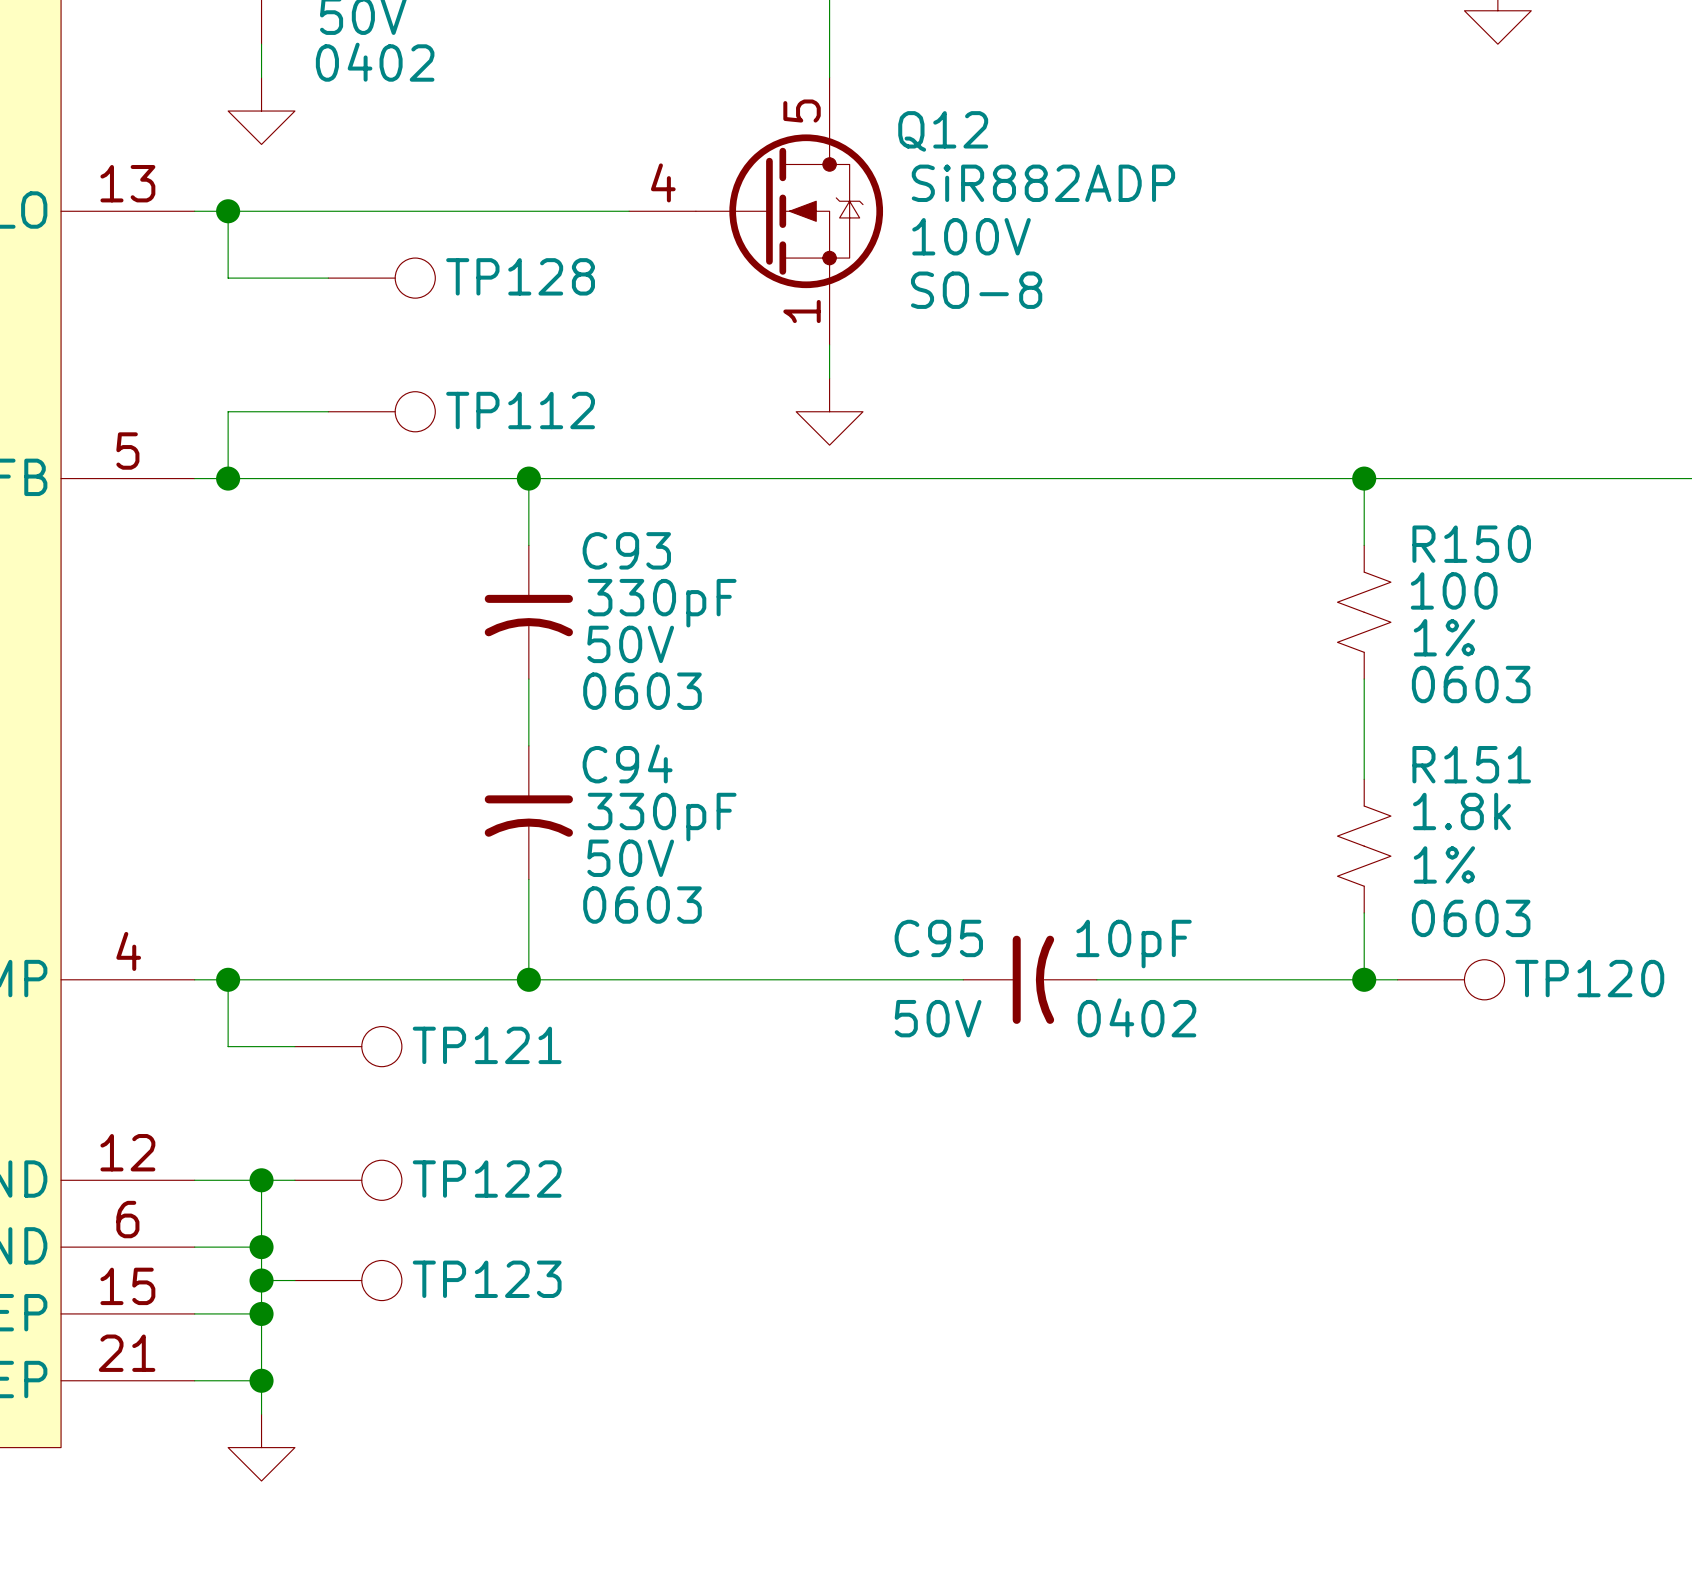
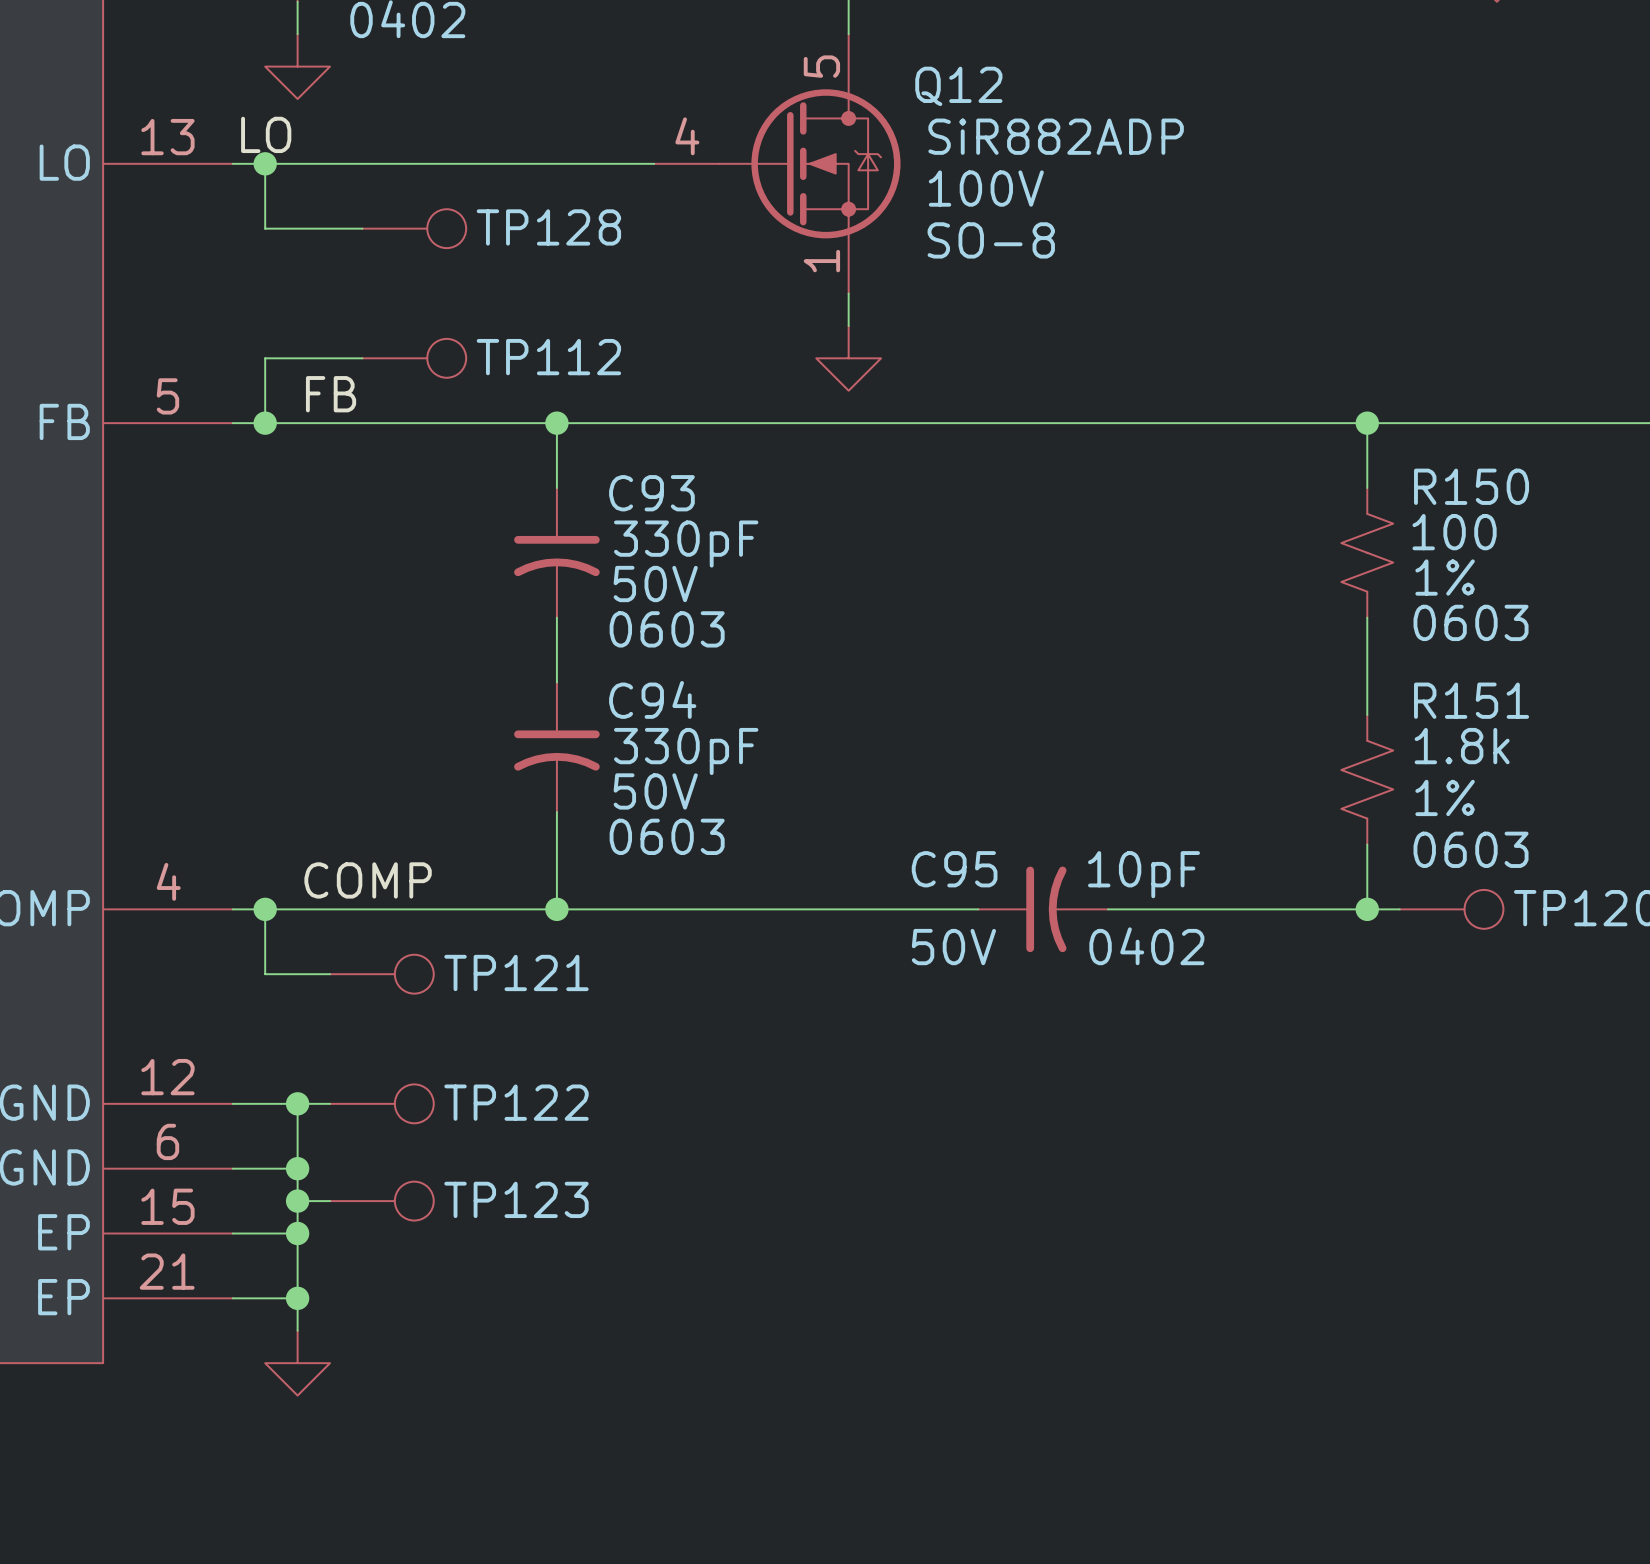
label: none -> LO (266, 134)
label: none -> FB (331, 394)
label: none -> COMP (368, 880)

